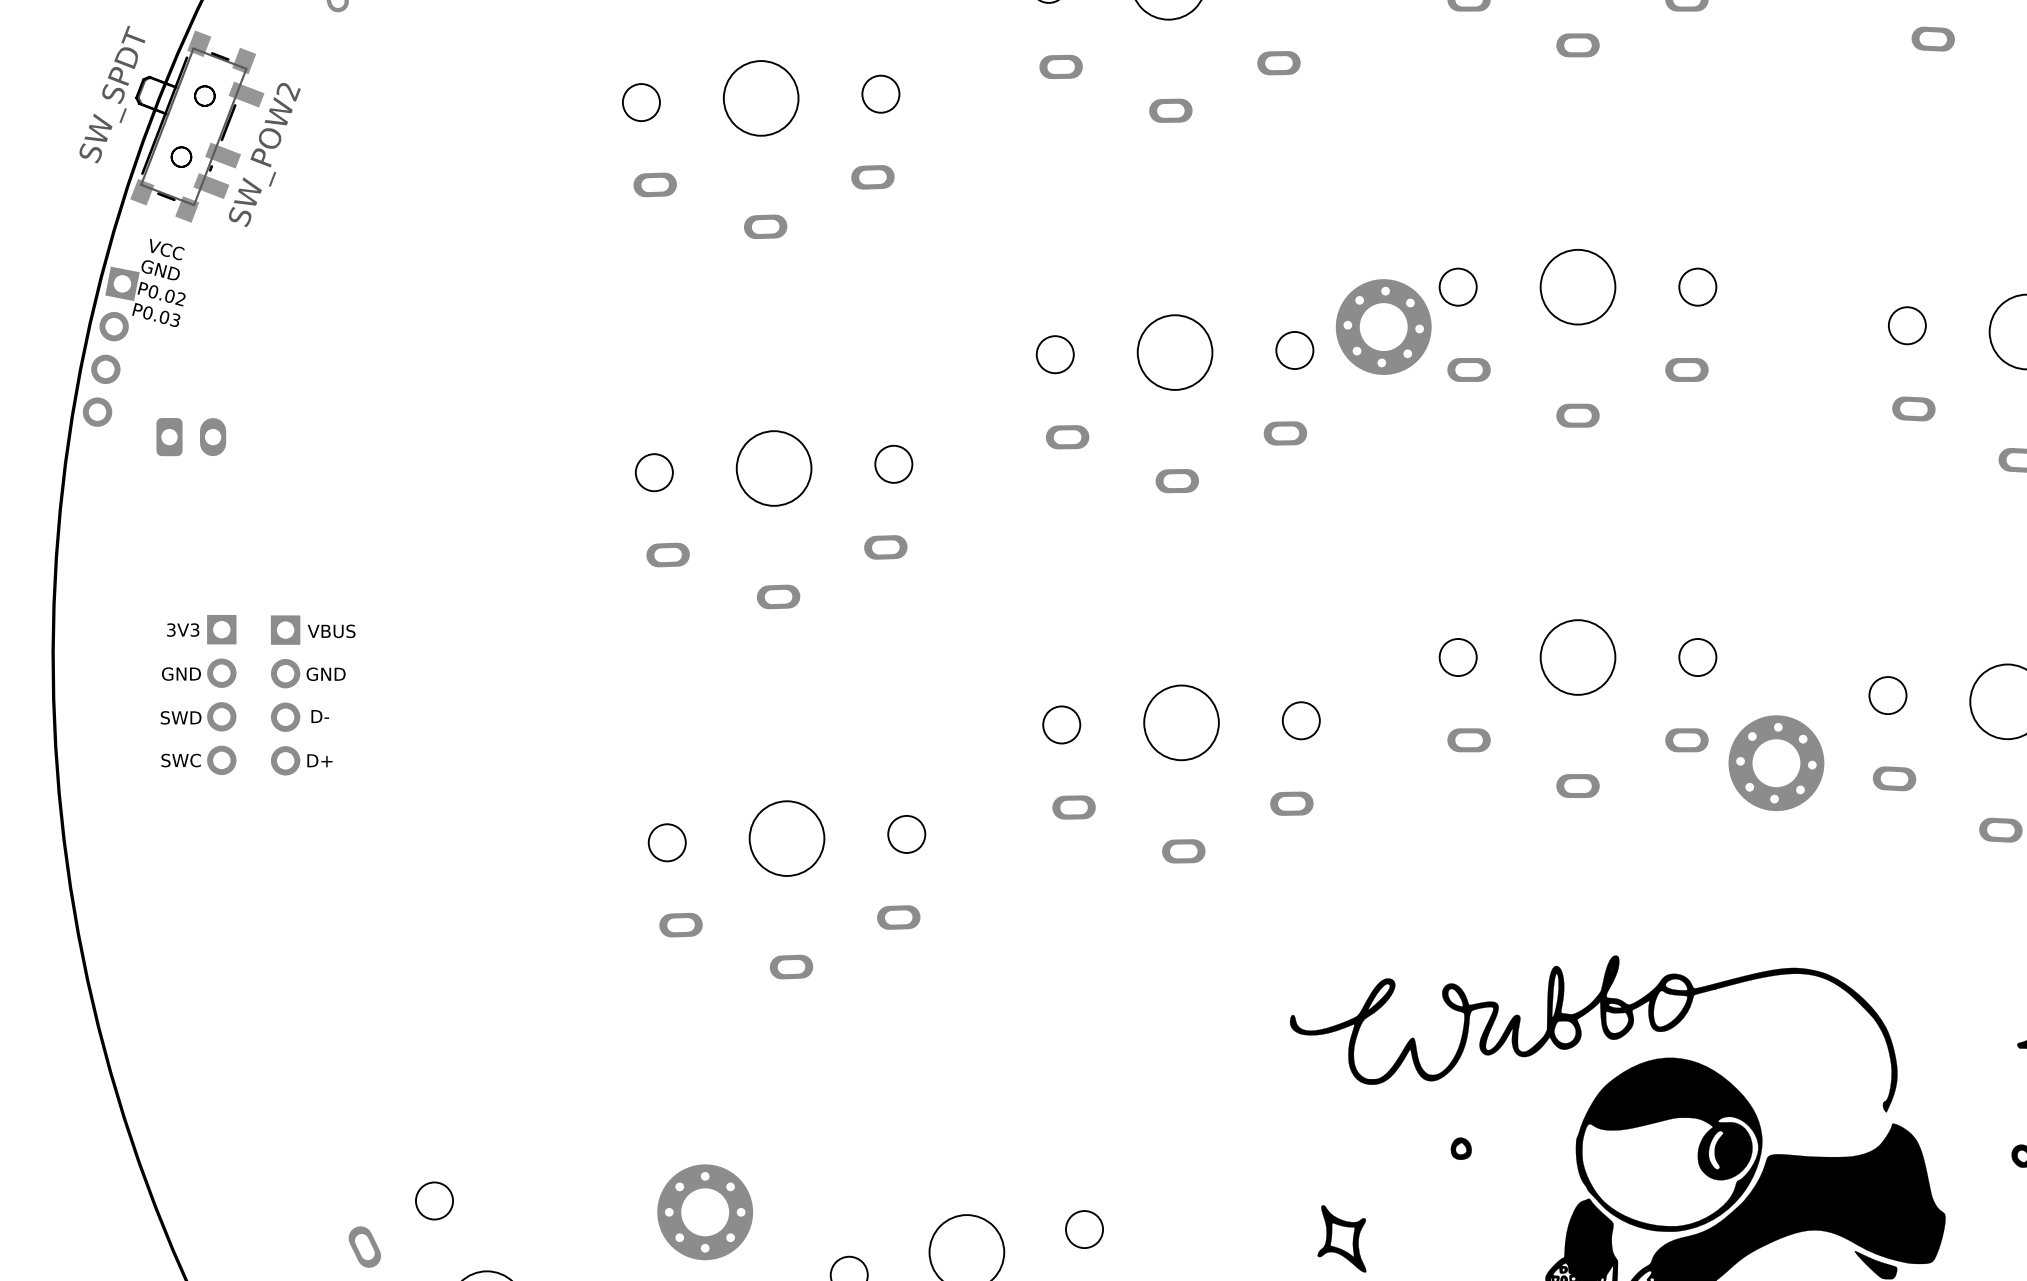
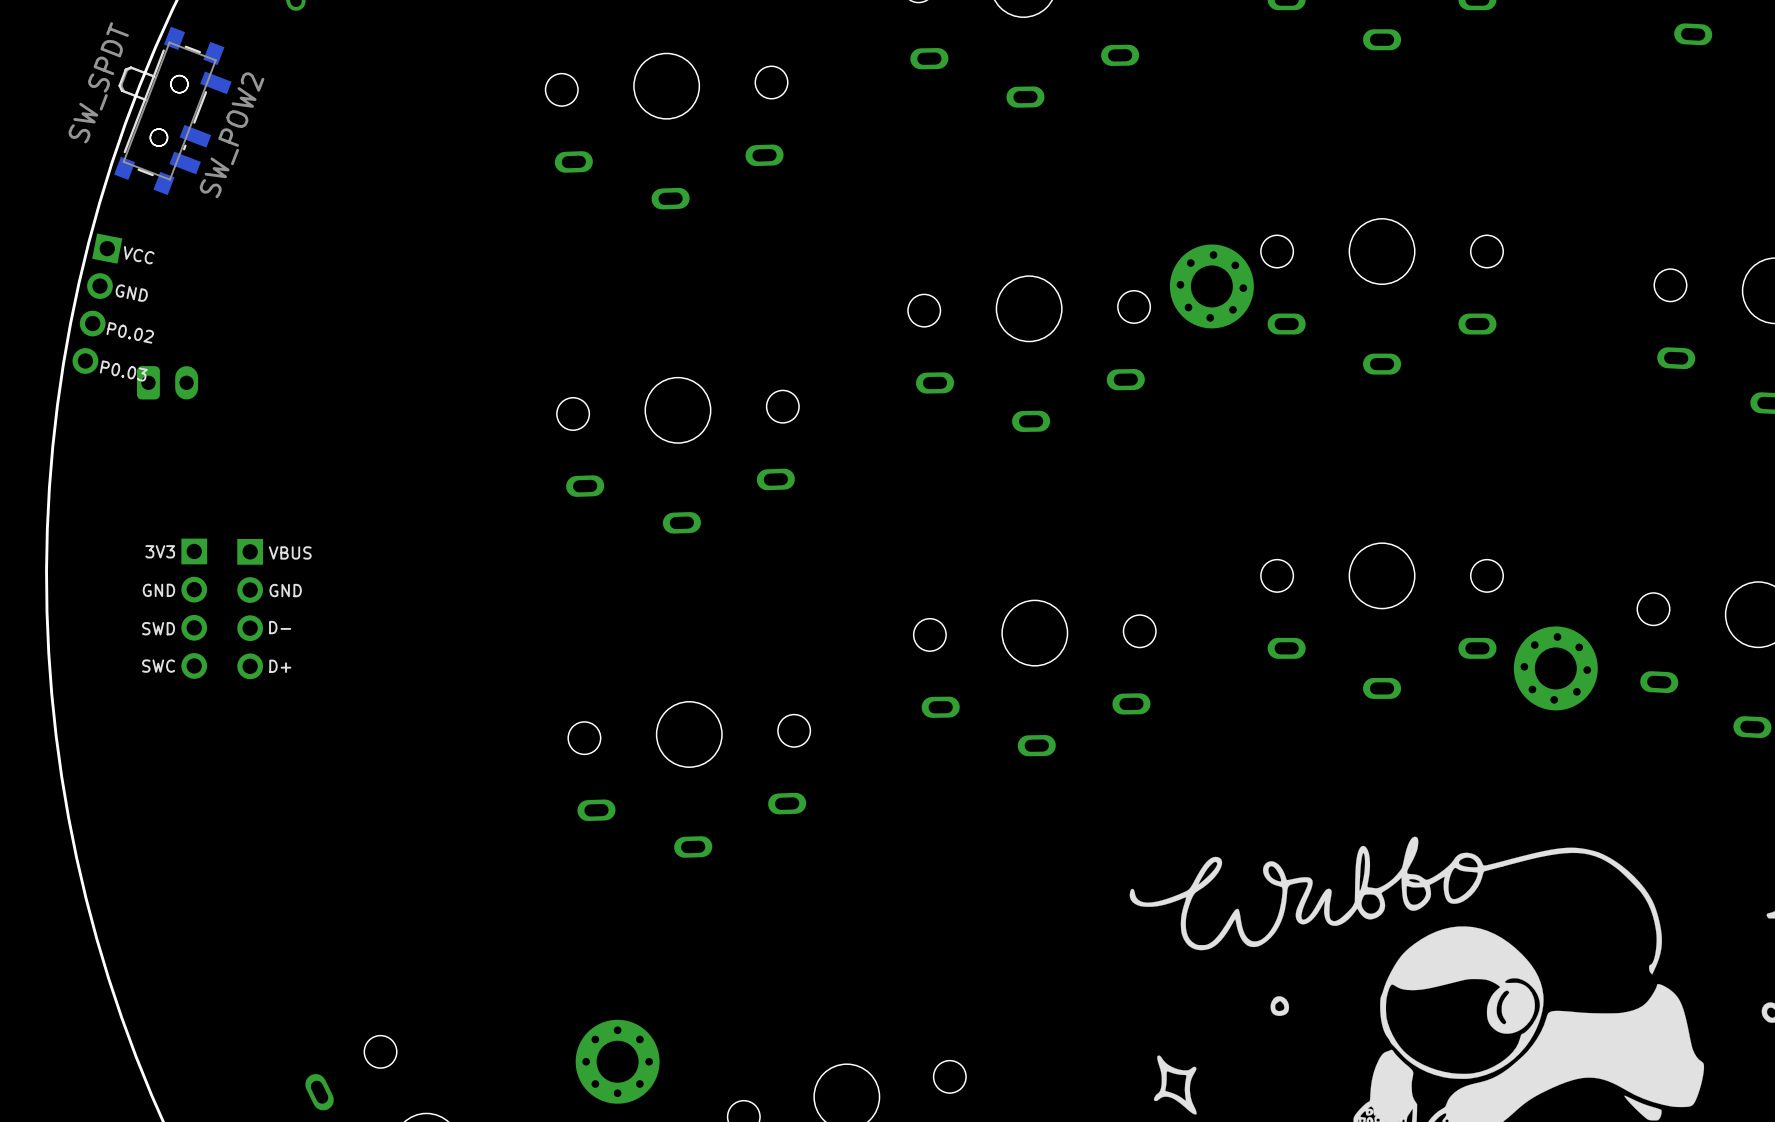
text rotation: 0° (167, 249) -> 4° counterclockwise (139, 255)
text rotation: 0° (160, 270) -> 4° counterclockwise (131, 293)
text position: GND (160, 270) -> GND (131, 293)
text rotation: 0° (161, 294) -> 4° counterclockwise (130, 332)
text position: P0.02 (161, 294) -> P0.02 (130, 332)
text rotation: 0° (156, 315) -> 4° counterclockwise (123, 370)
text position: P0.03 (156, 315) -> P0.03 (123, 370)

